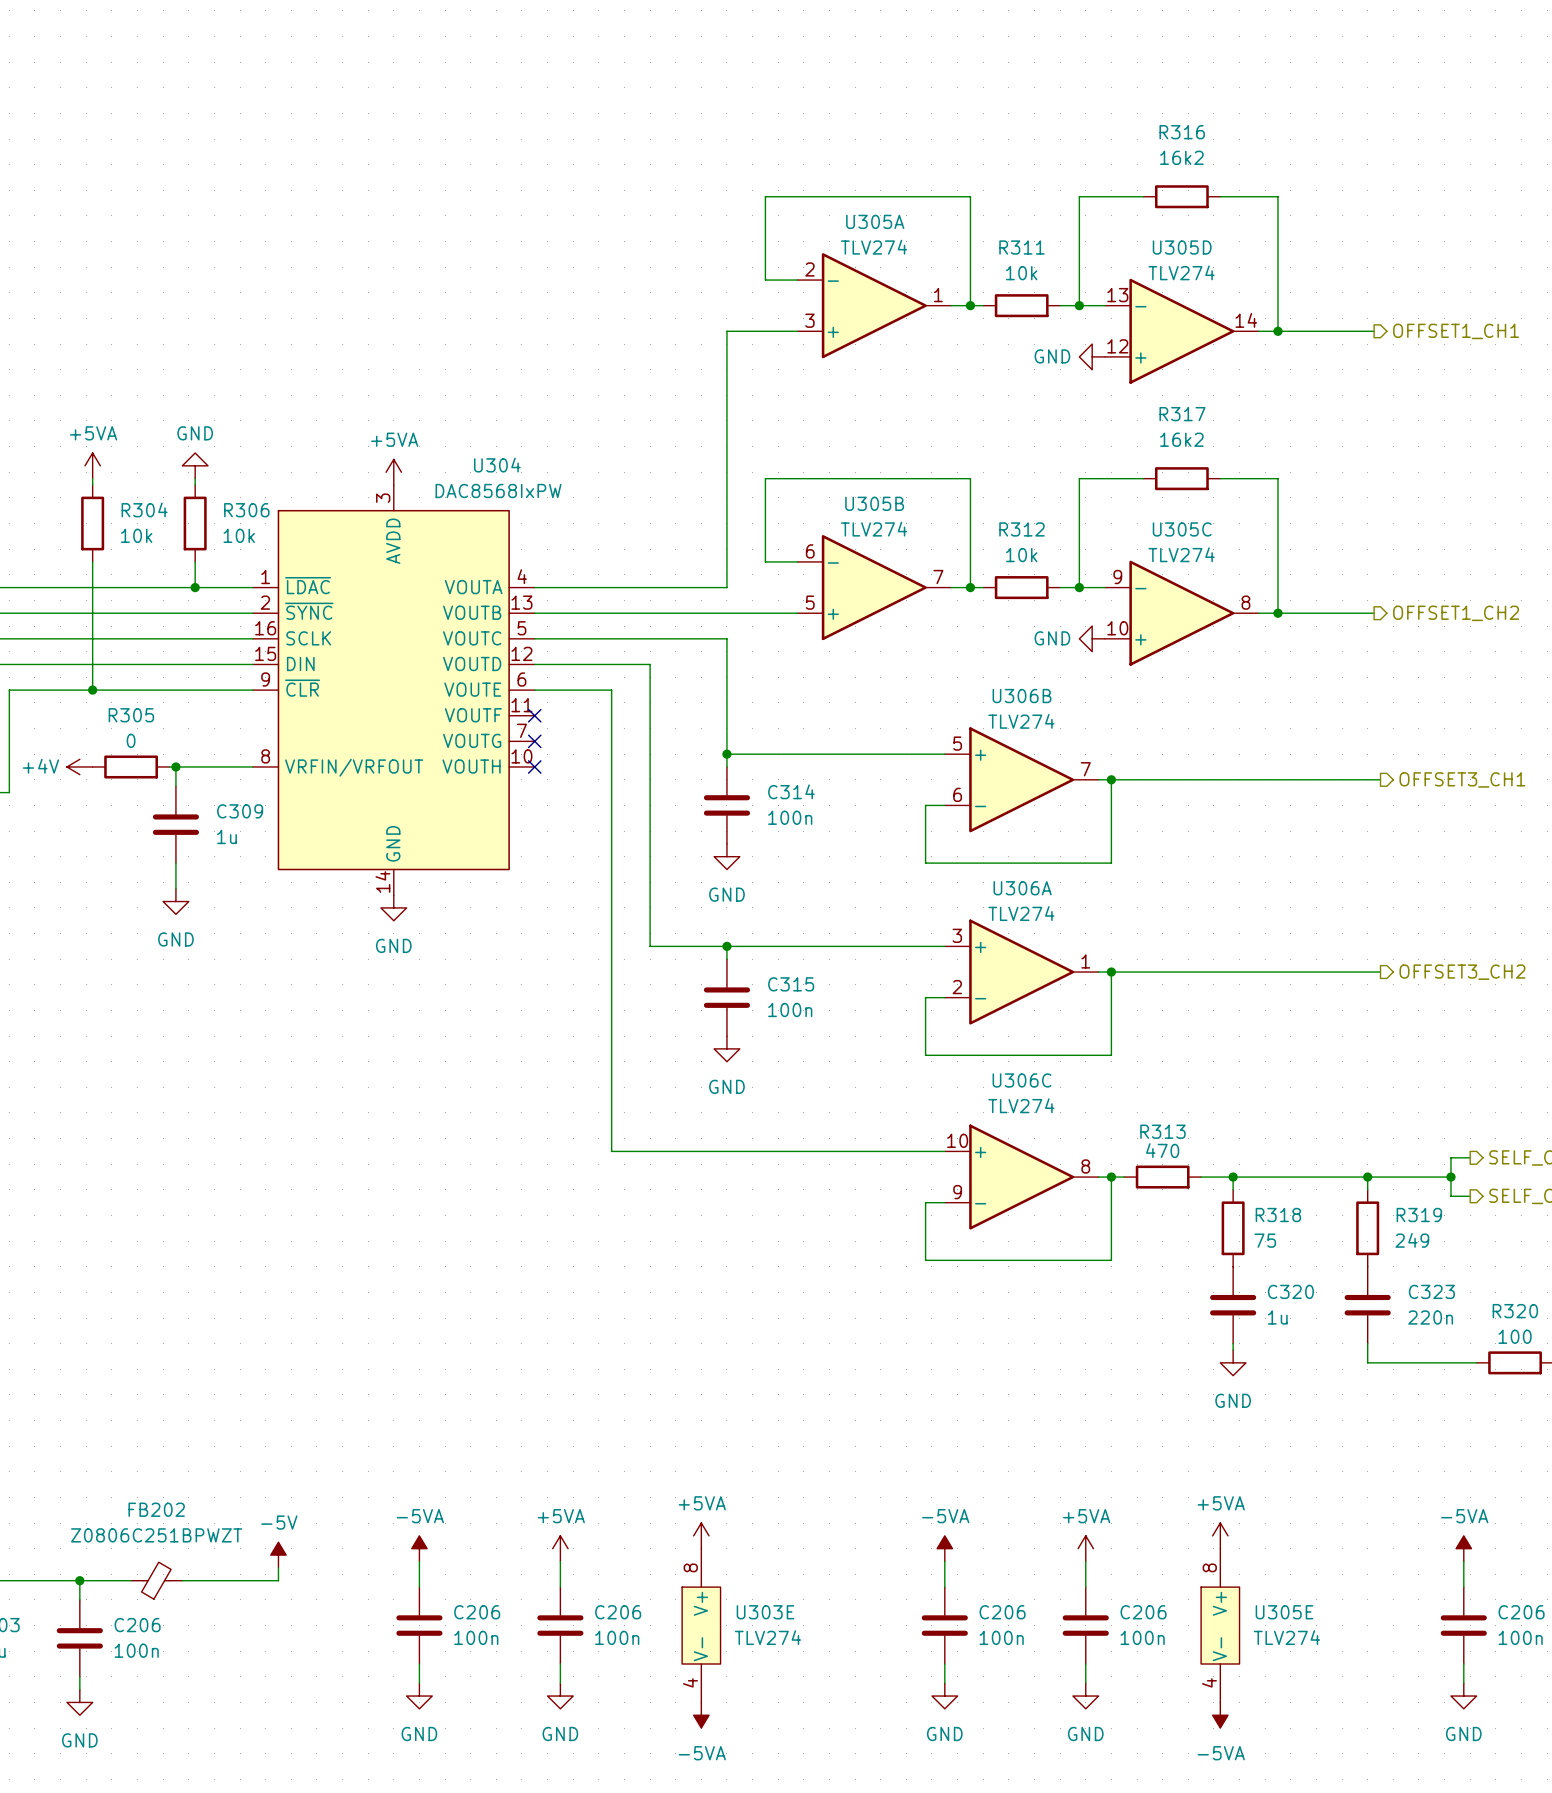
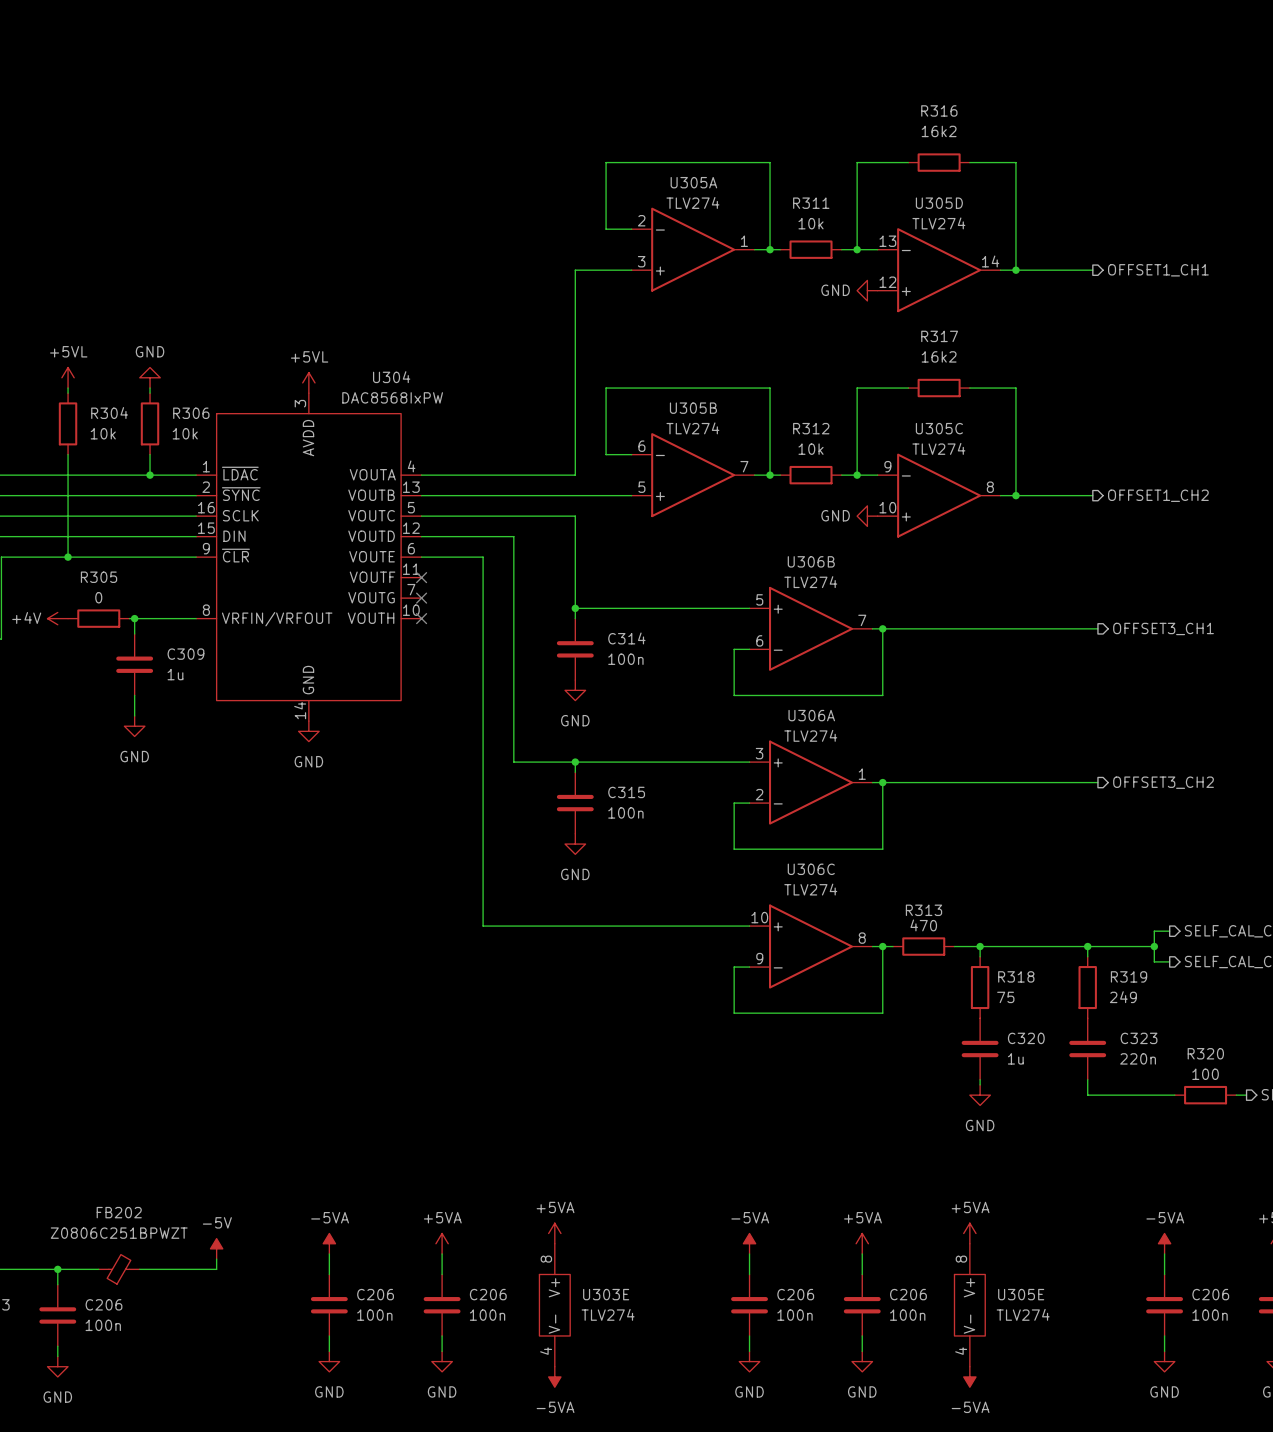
power symbol: +5VA (92, 465) -> +5VL (68, 377)
power symbol: +5VA (393, 472) -> +5VL (308, 382)

